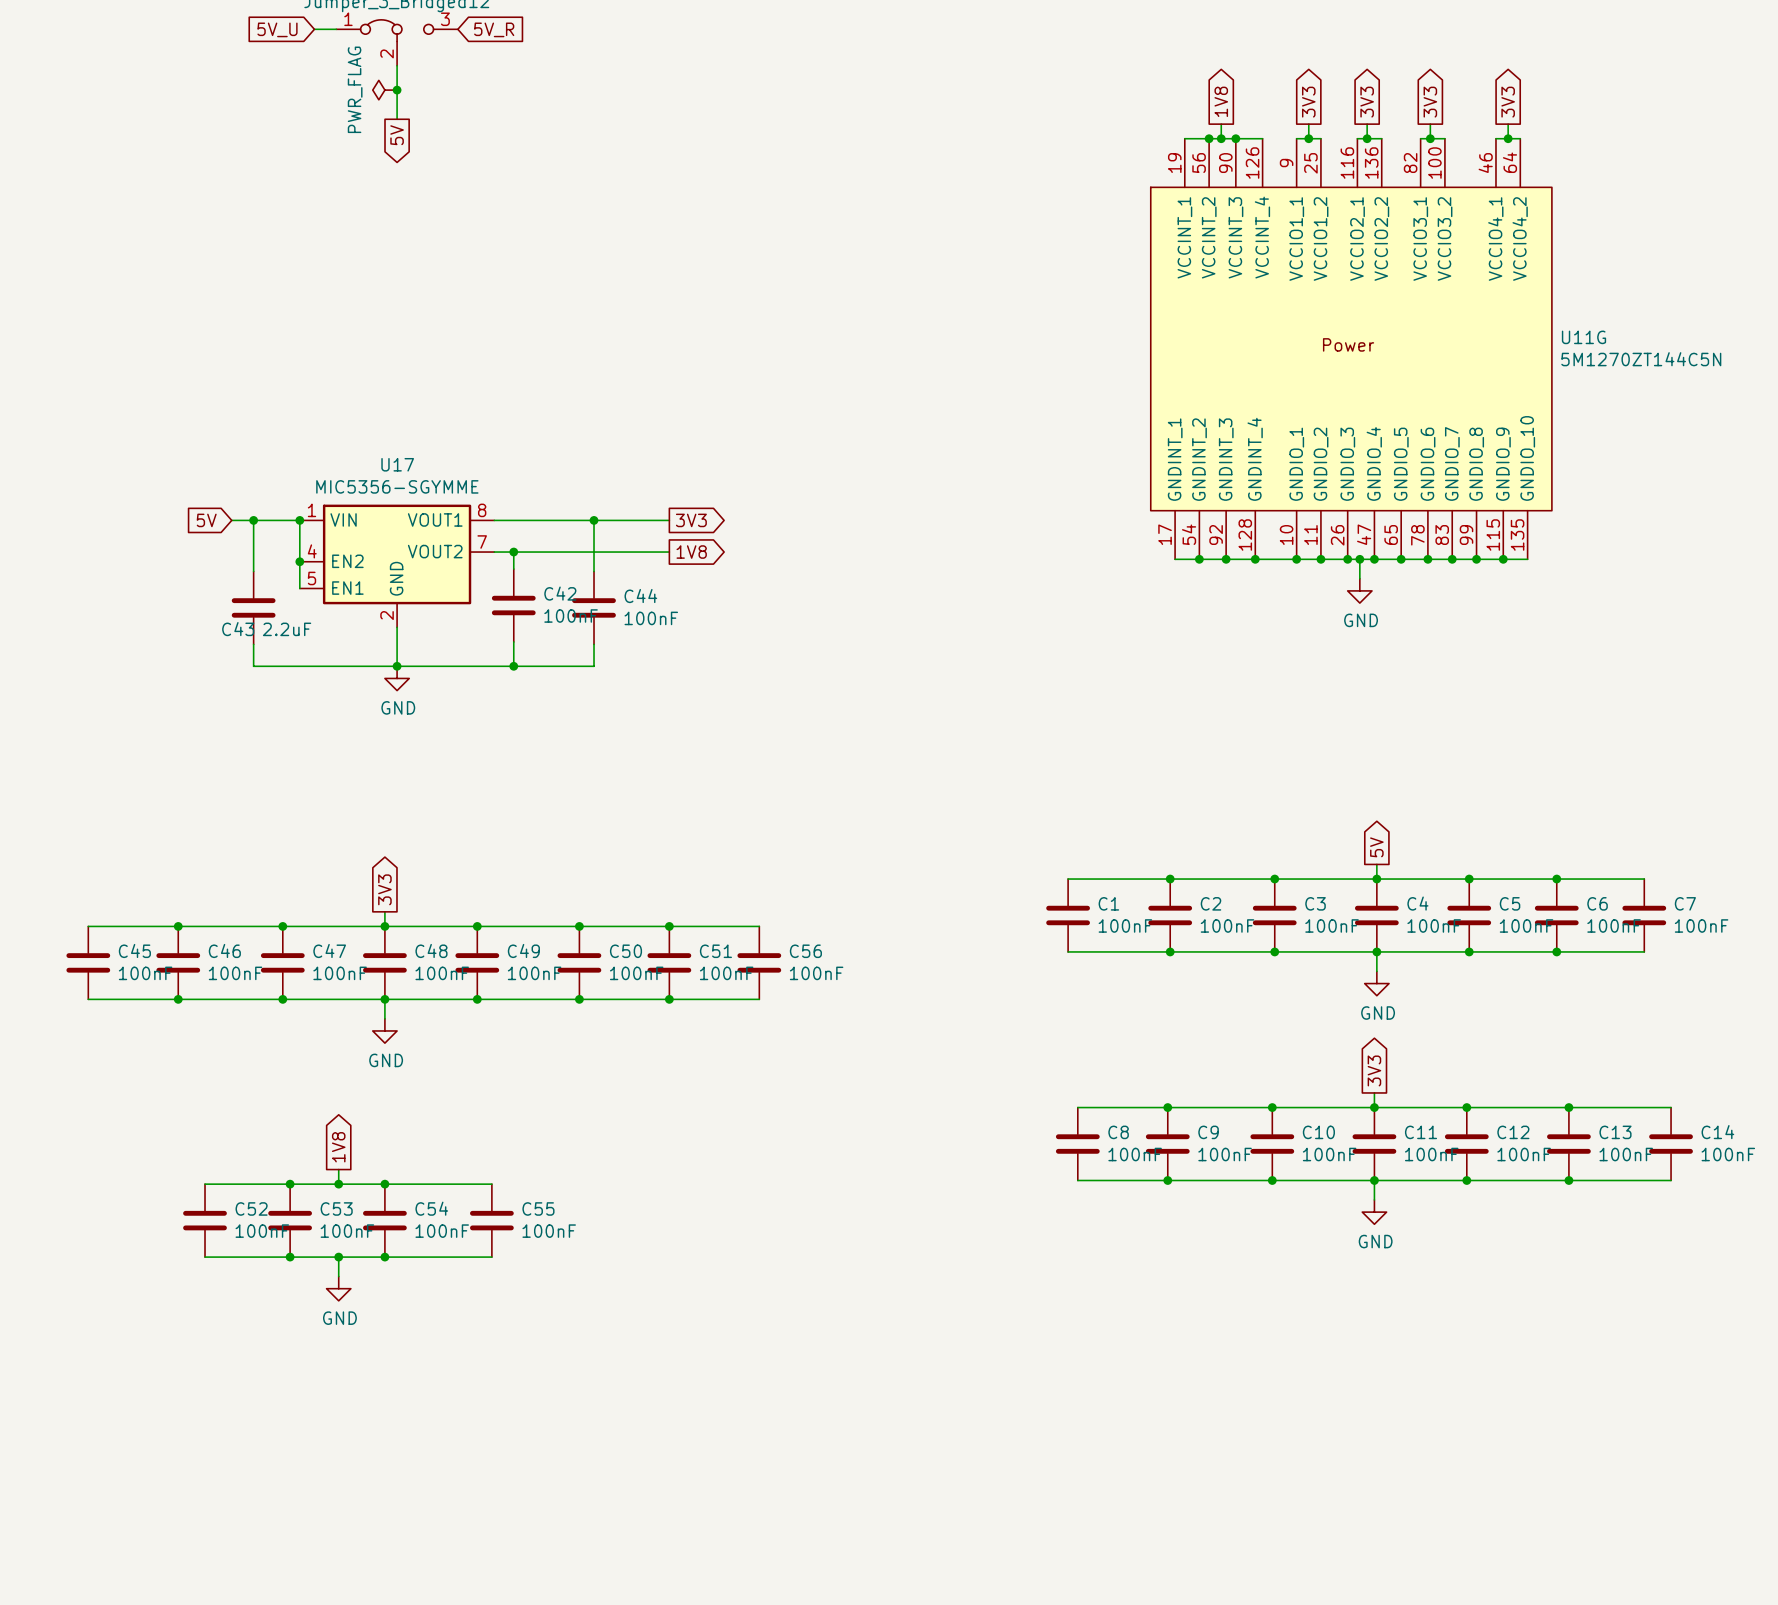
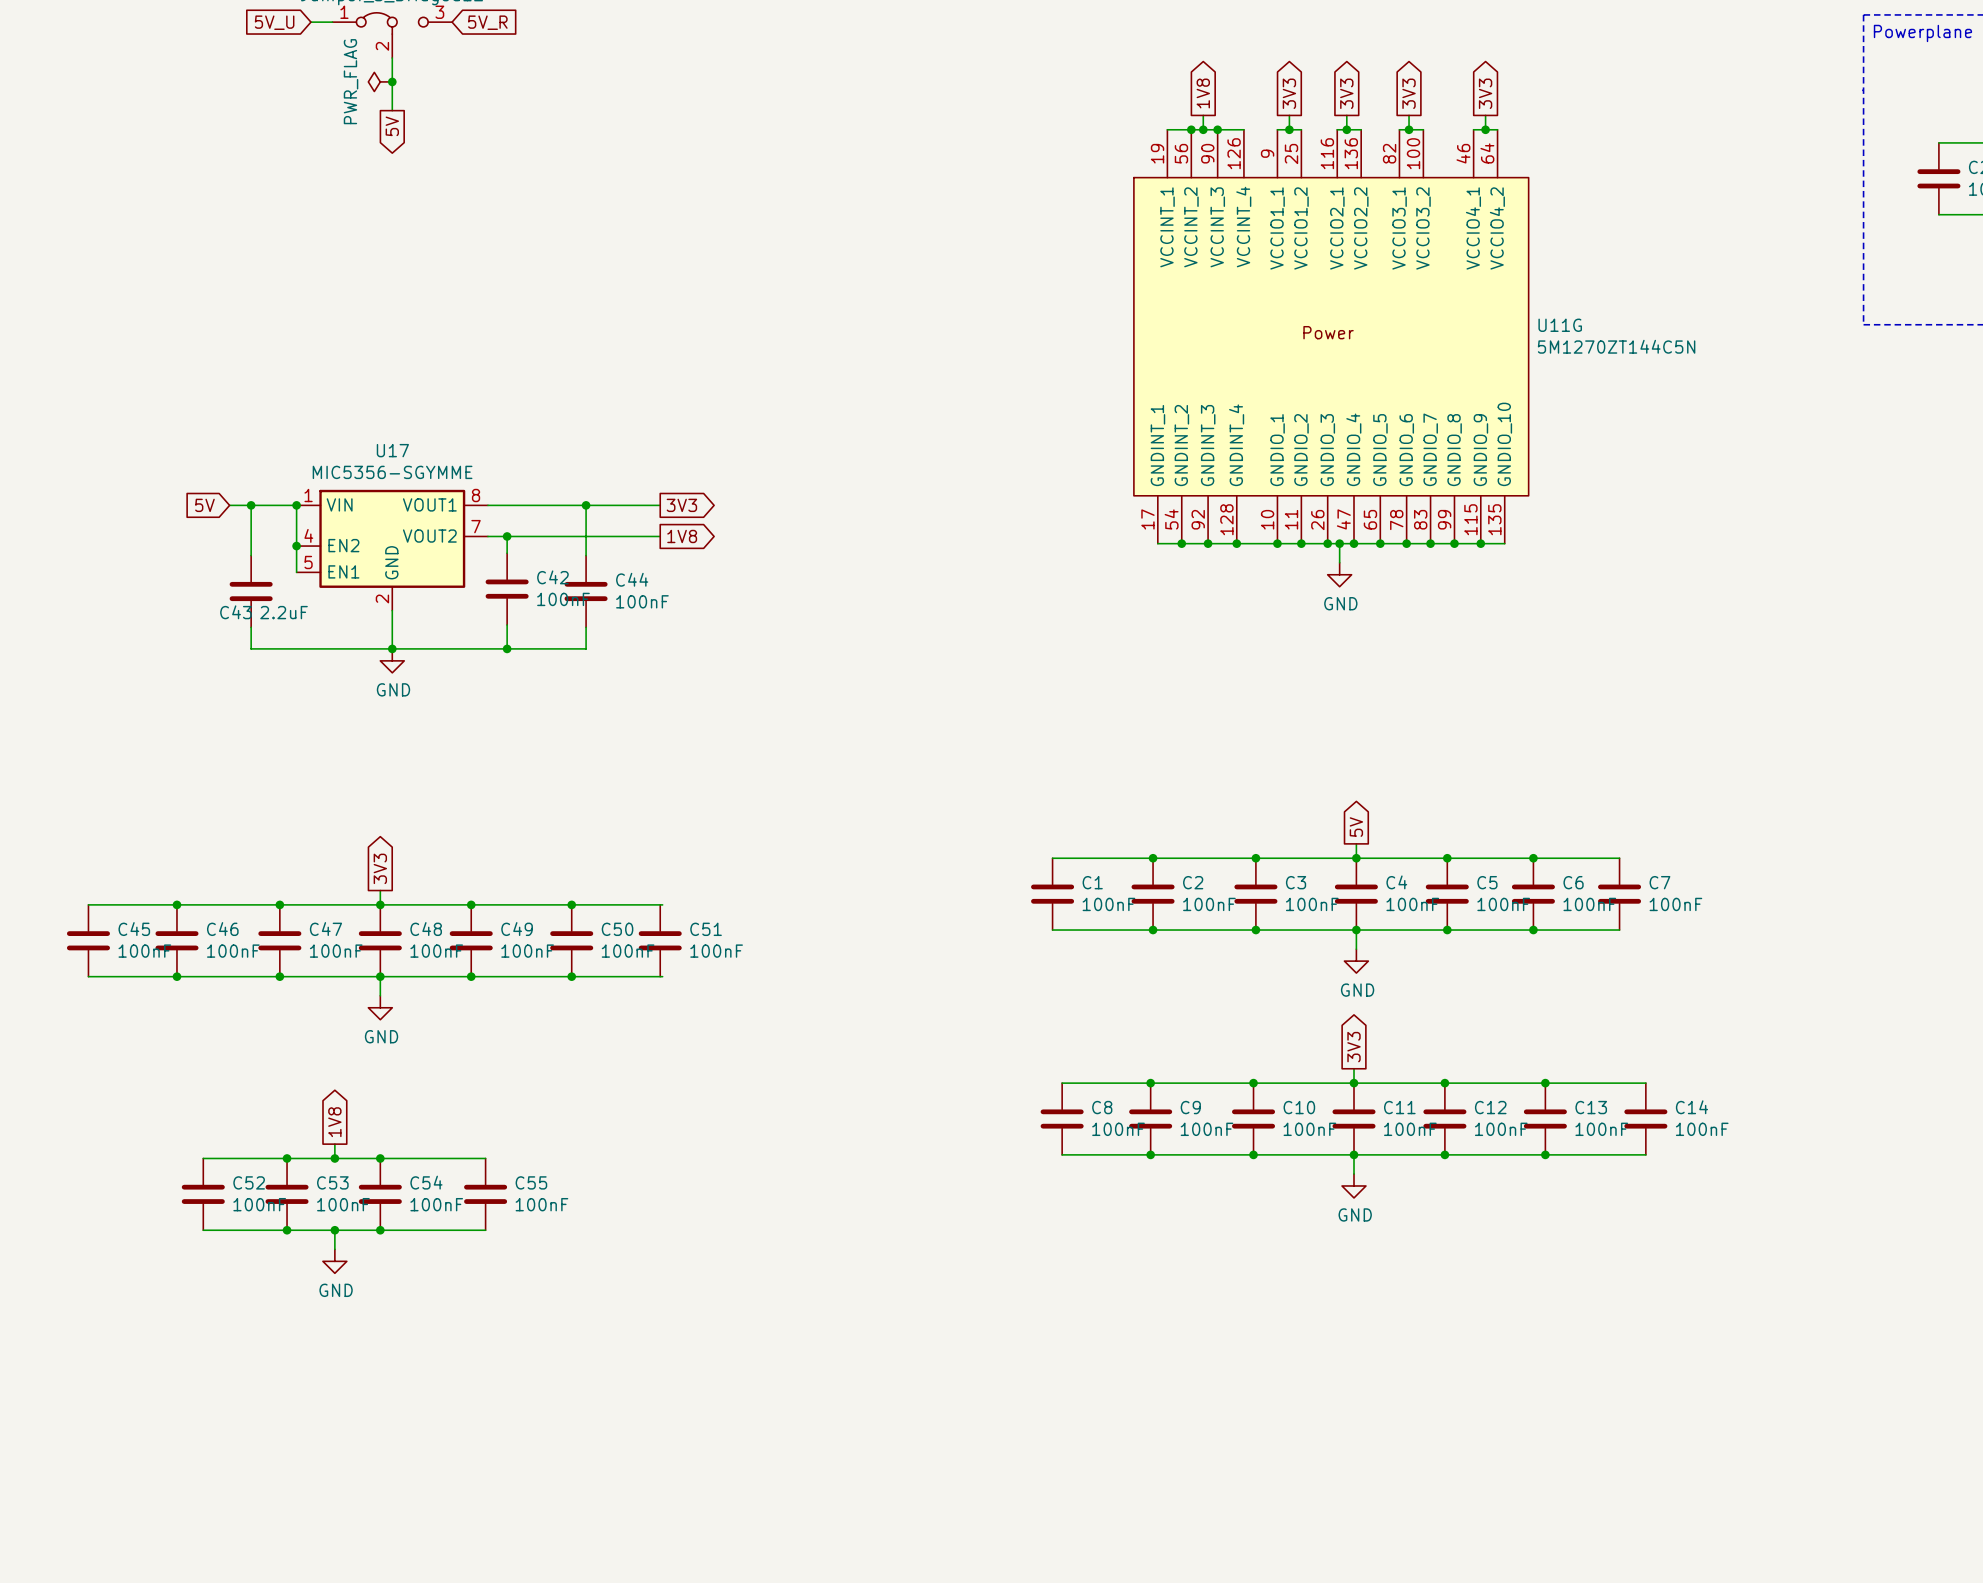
junction: (669, 926) -> none
wire: (671, 926) (759, 926) -> none
C56: 100nF (759, 962) -> none
junction: (669, 999) -> none
wire: (671, 999) (759, 999) -> none

